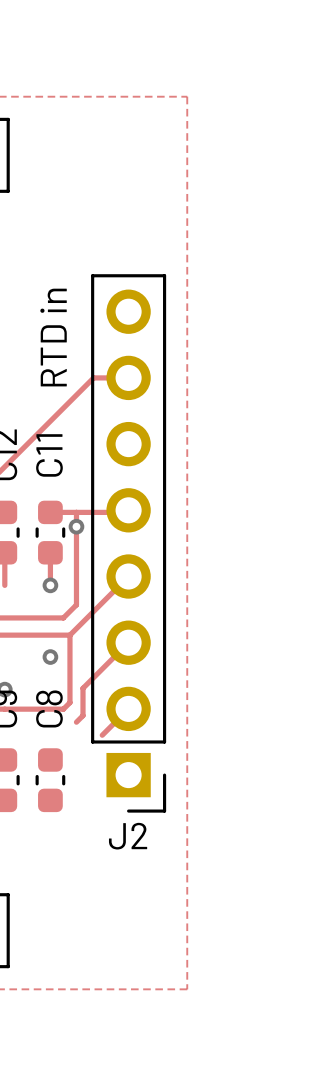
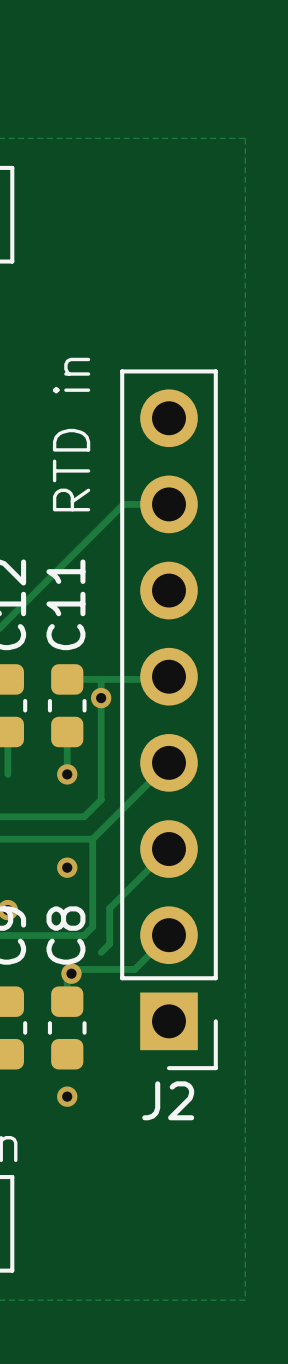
track: none -> (134, 969) (75, 969) (67, 977) (67, 1001)
via: none -> (71, 973)
via: none -> (67, 1096)

